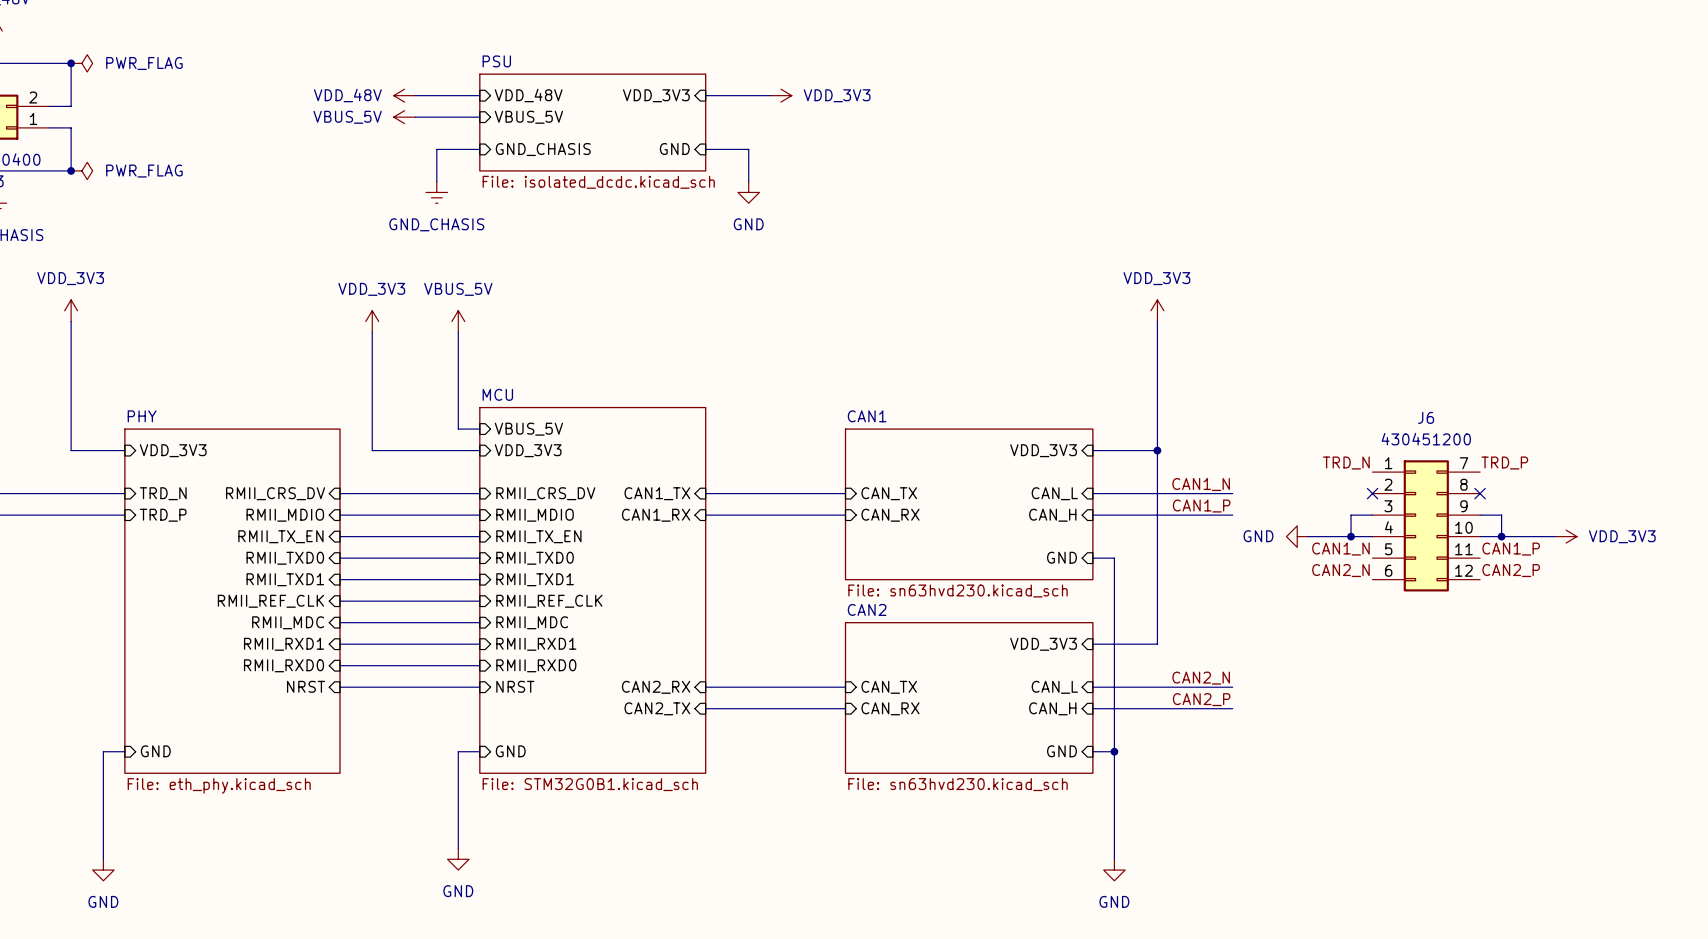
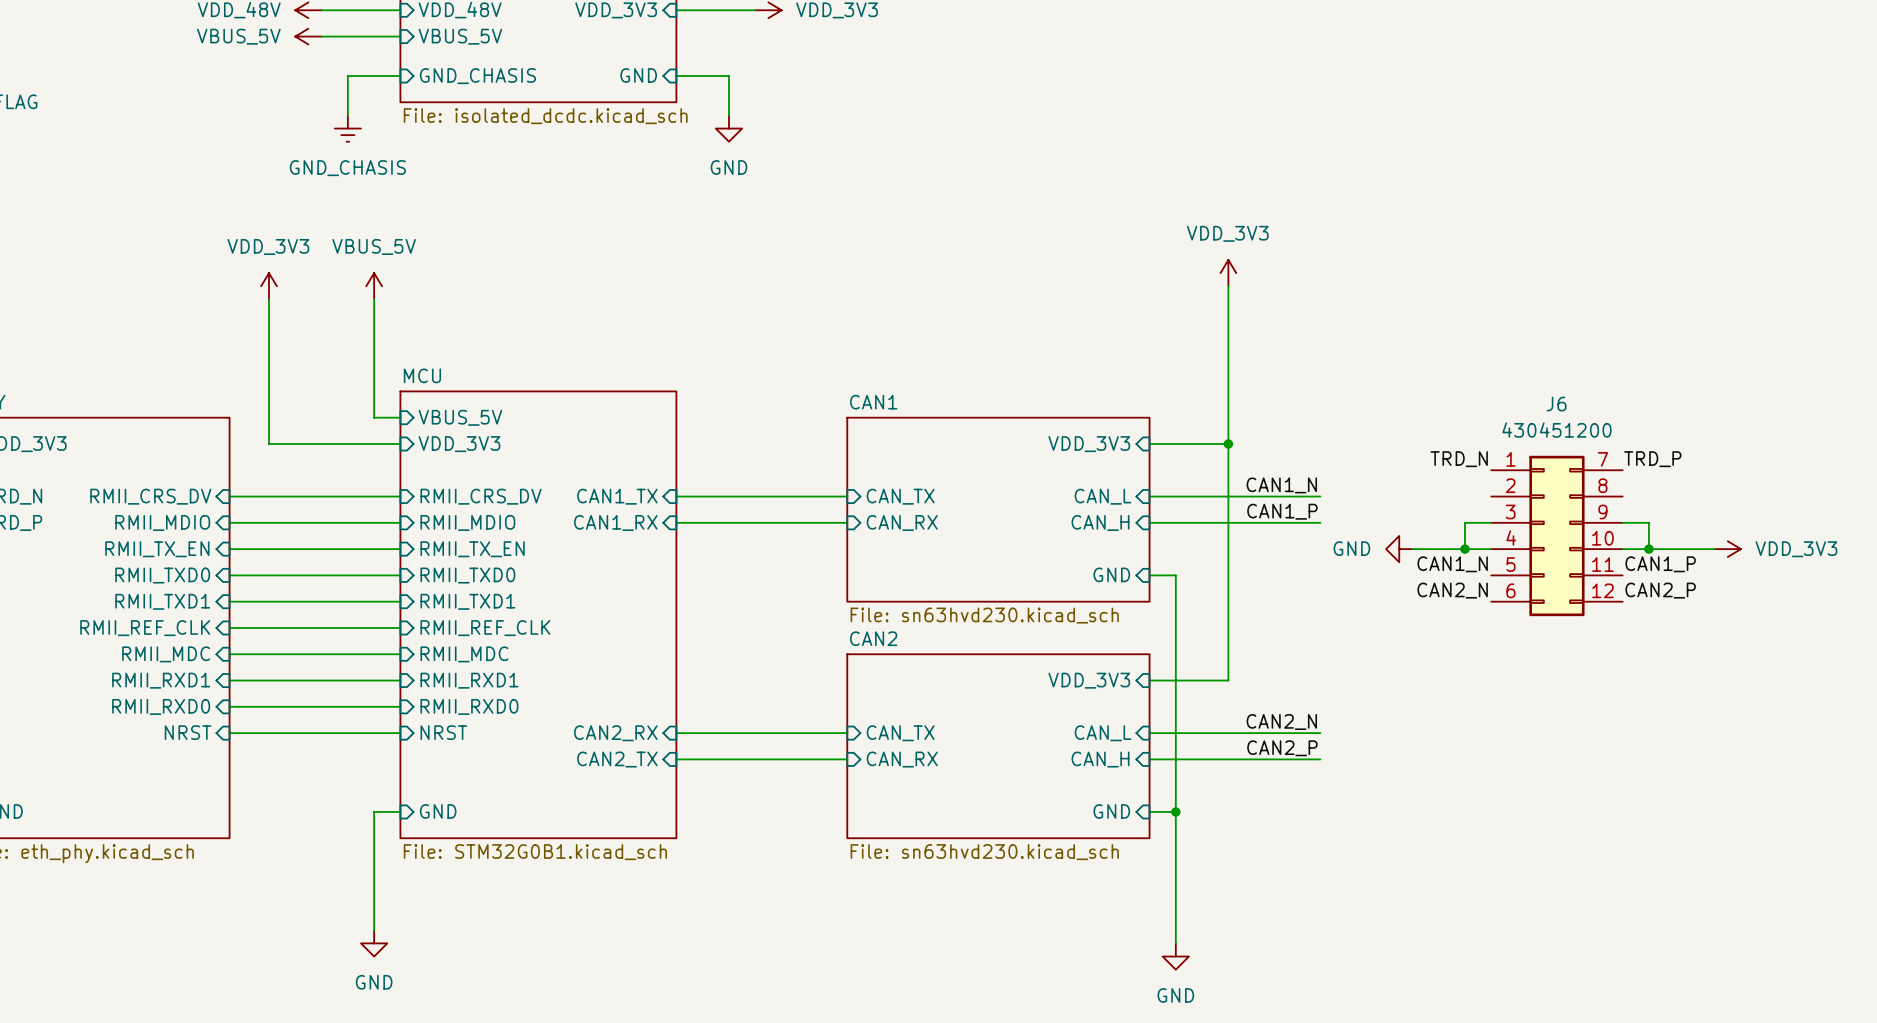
no-connect mark: (1372, 493) -> none
no-connect mark: (1480, 493) -> none

